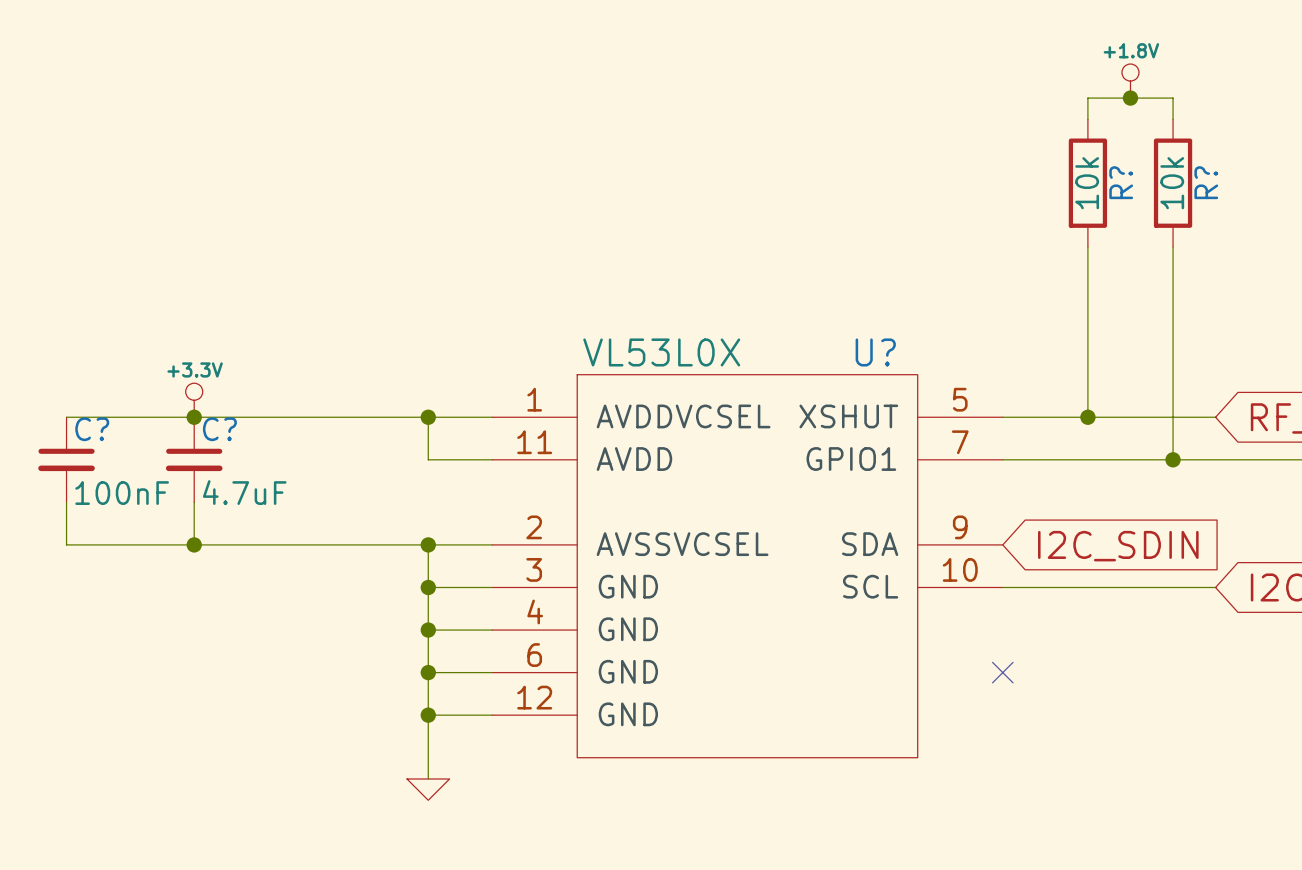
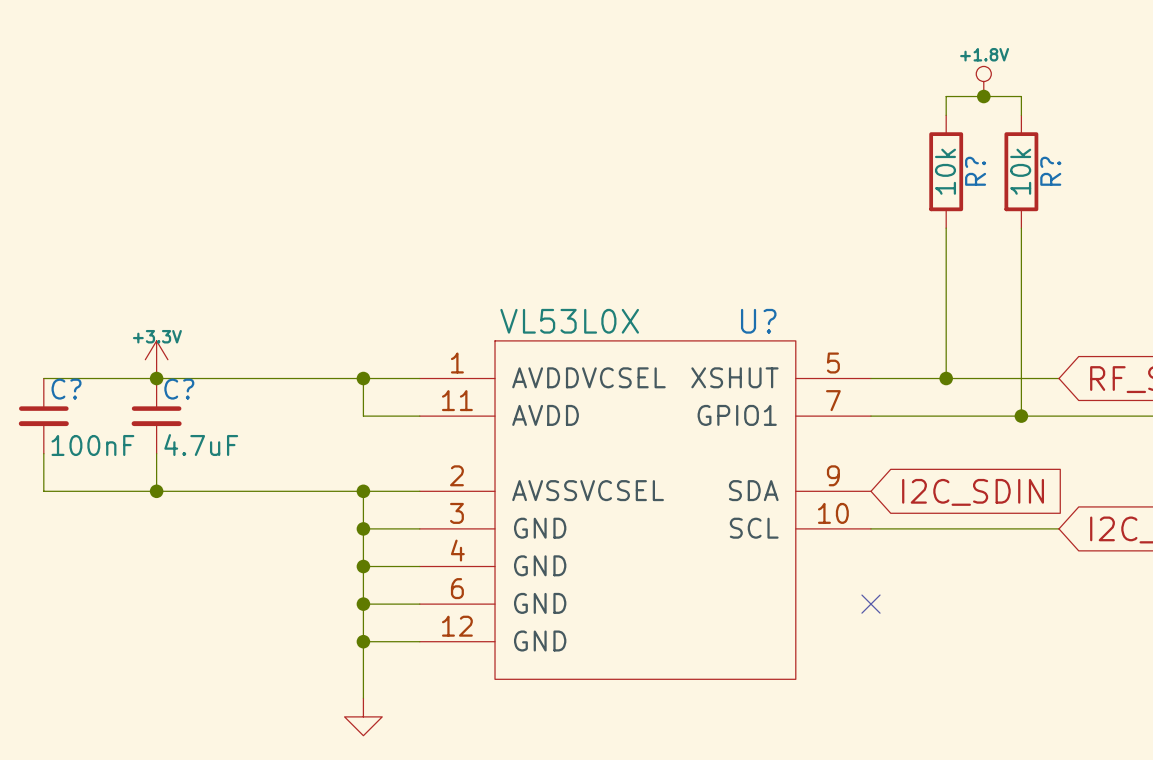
power symbol shape: [185, 383, 203, 418] -> [145, 340, 168, 379]
power symbol shape: [407, 778, 450, 801] -> [344, 698, 383, 736]

